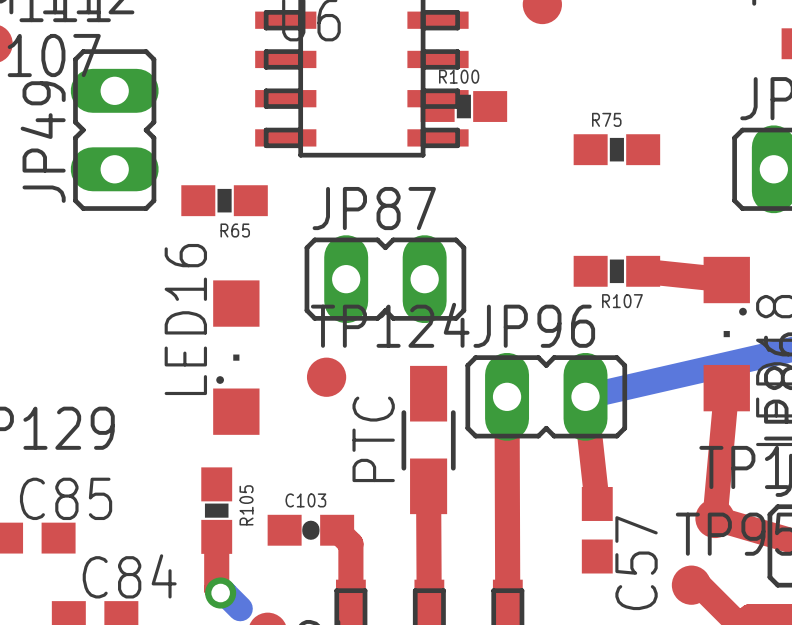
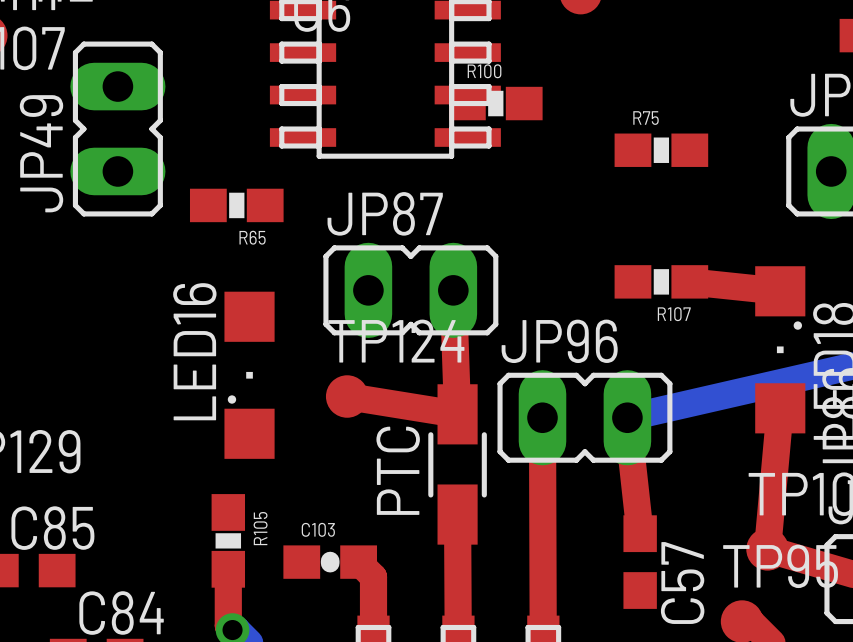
top track: none -> (453, 290) (457, 414) (347, 396)

